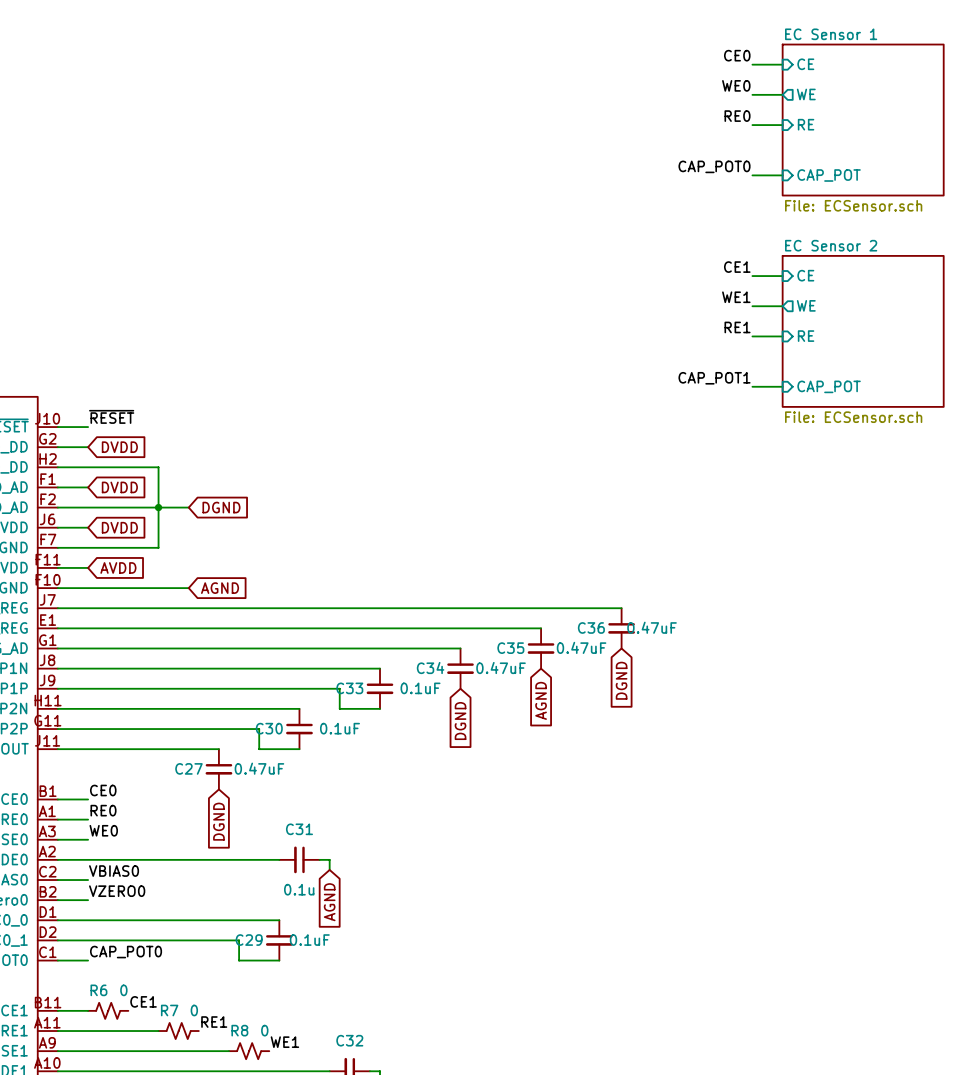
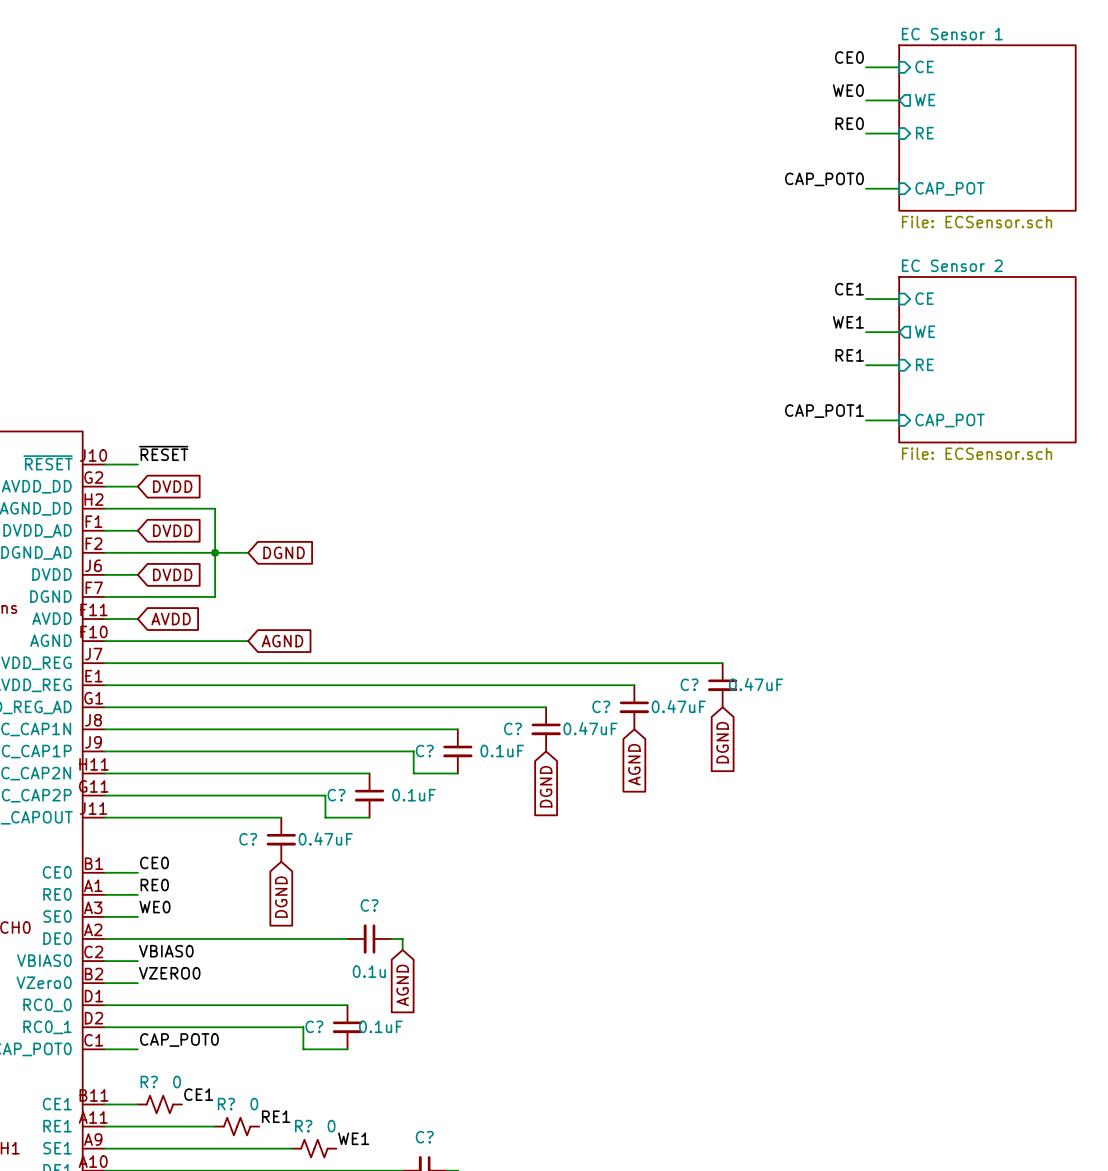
C36 name: C36 (591, 627) -> C? (689, 684)
C35 name: C35 (510, 648) -> C? (601, 706)
C34 name: C34 (430, 668) -> C? (513, 728)
C33 name: C33 (349, 688) -> C? (424, 751)
C30 name: C30 (269, 728) -> C? (336, 795)
C27 name: C27 (188, 768) -> C? (248, 839)
C31 name: C31 (299, 829) -> C? (369, 905)
C29 name: C29 (249, 940) -> C? (314, 1026)
R6 name: R6 (98, 990) -> R? (149, 1082)
R7 name: R7 (169, 1010) -> R? (226, 1104)
R8 name: R8 (239, 1030) -> R? (303, 1126)
C32 name: C32 (349, 1040) -> C? (424, 1137)

